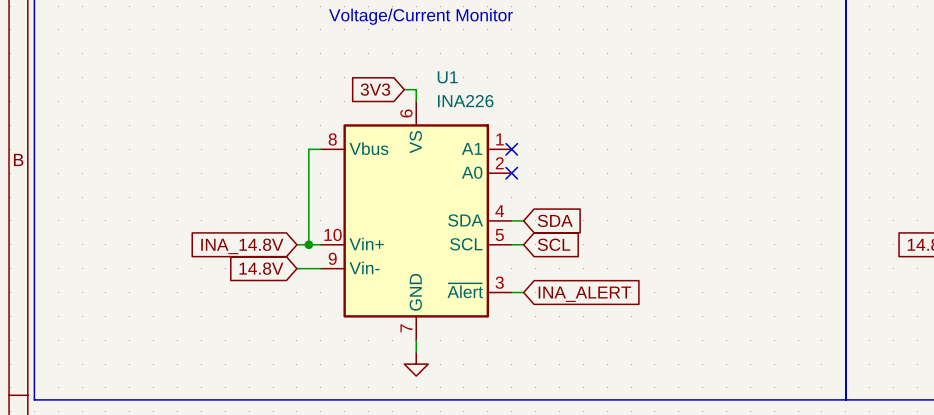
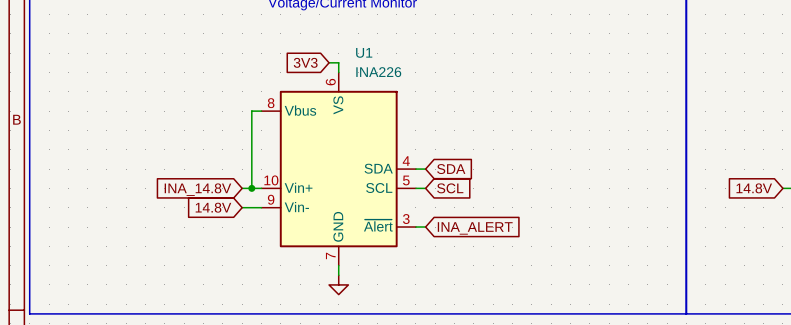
U1 symbol: [320, 101, 512, 341] -> [261, 72, 416, 266]
no-connect mark: (511, 149) -> none
no-connect mark: (511, 173) -> none

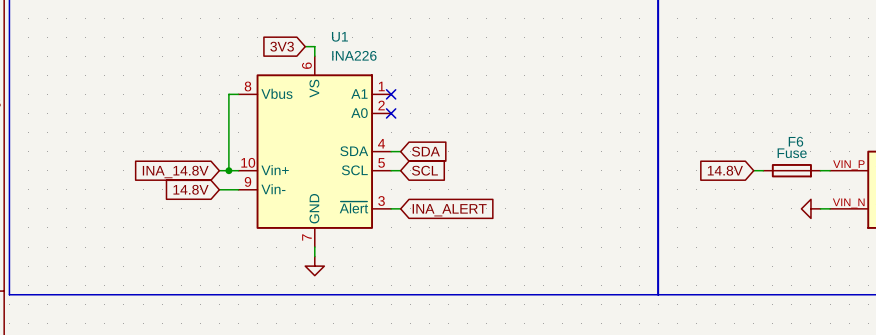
U1 symbol: [261, 72, 416, 266] -> [238, 56, 392, 248]
no-connect mark: none -> (391, 94)
no-connect mark: none -> (391, 113)

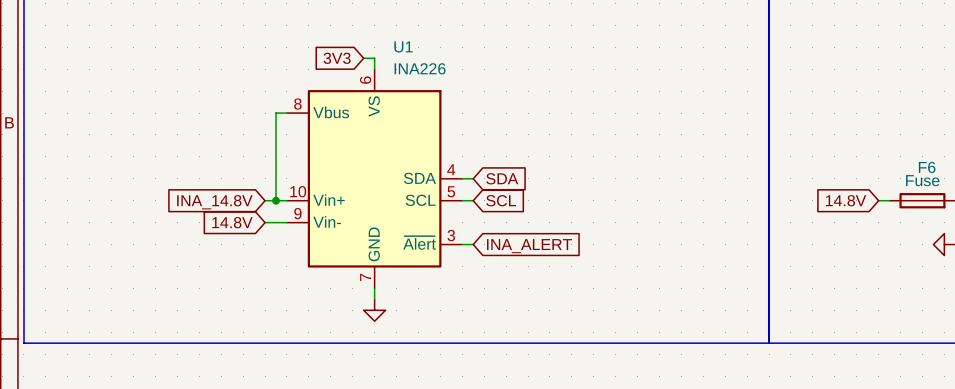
U1 symbol: [238, 56, 392, 248] -> [286, 69, 463, 289]
no-connect mark: (391, 94) -> none
no-connect mark: (391, 113) -> none

